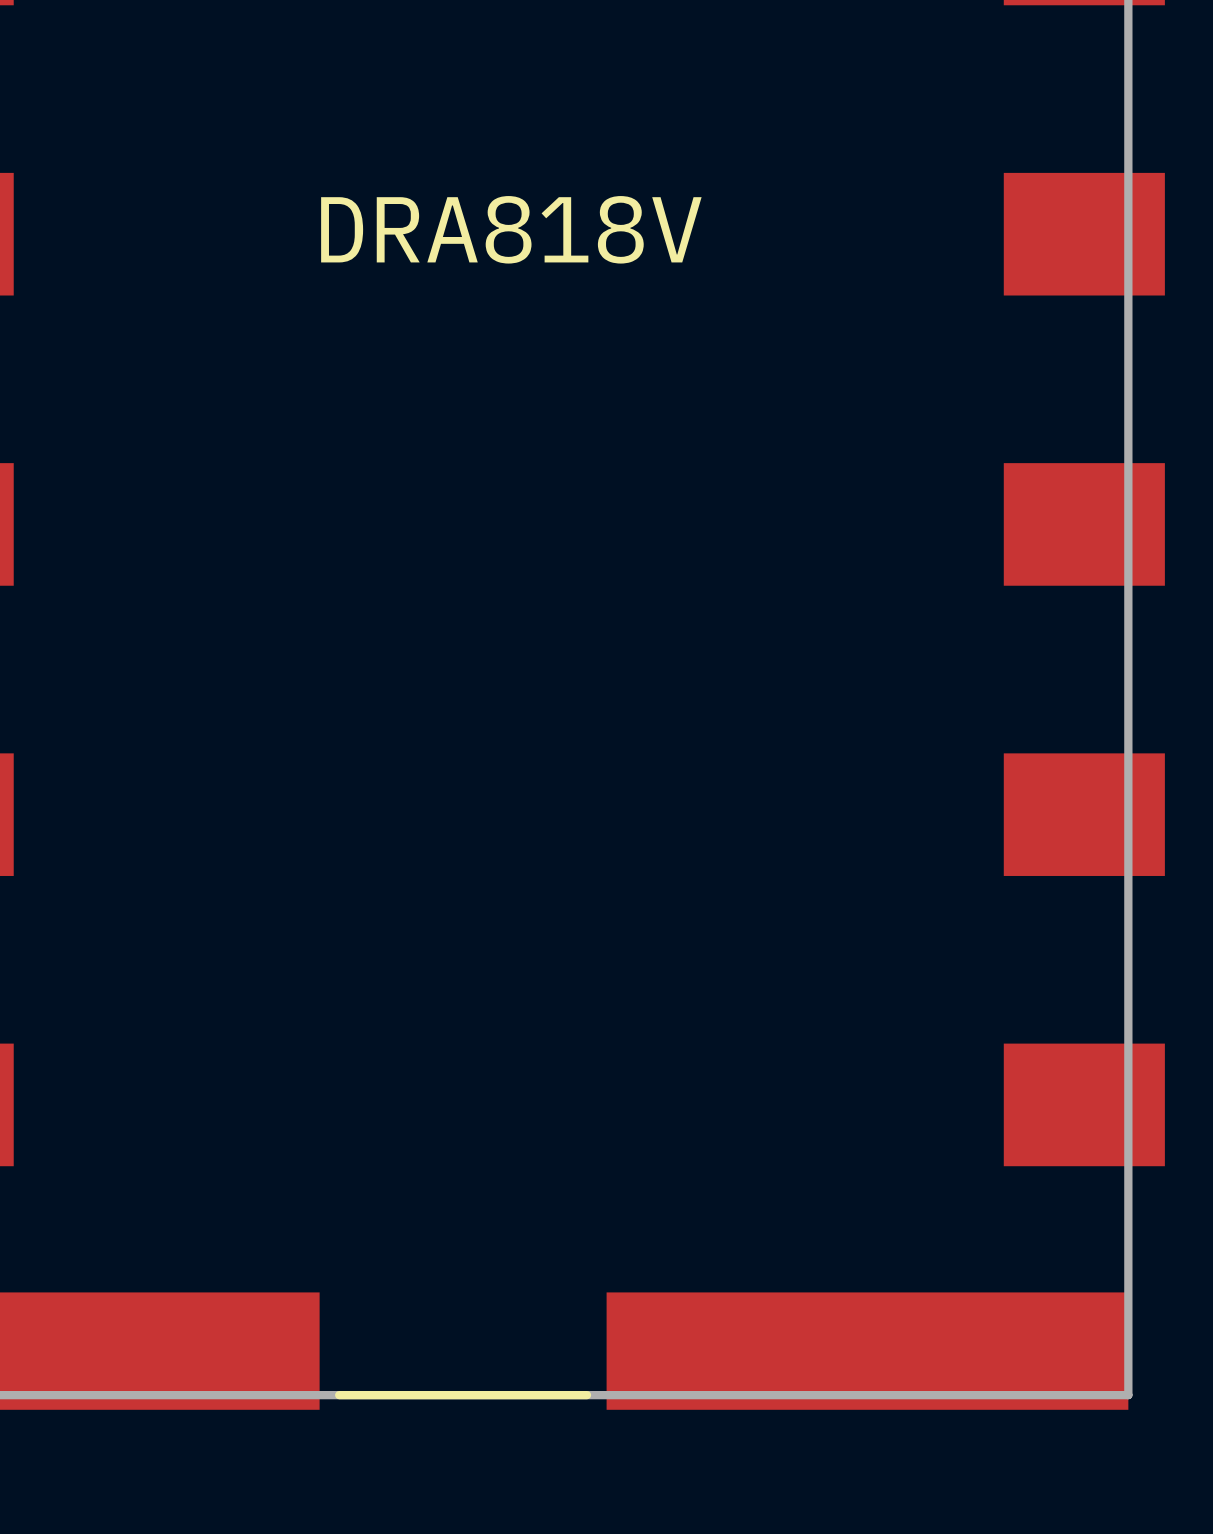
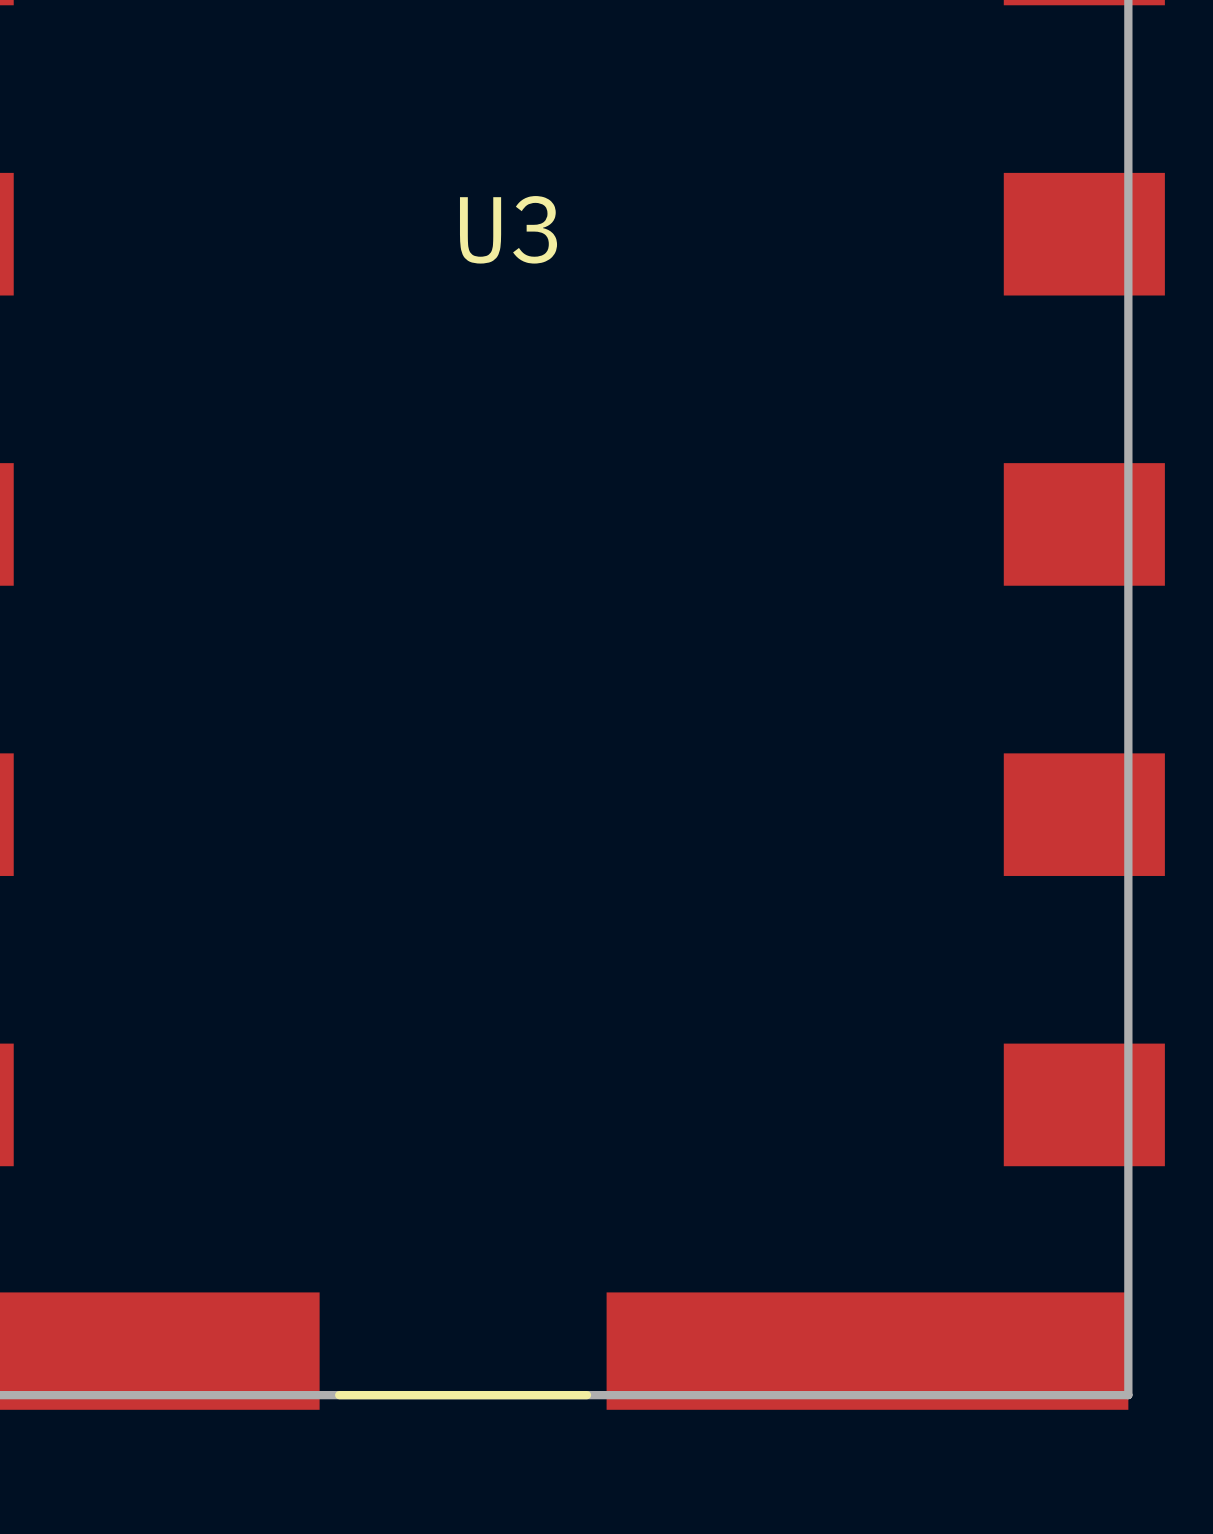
DRA818V name: DRA818V (511, 229) -> U3 (508, 229)

